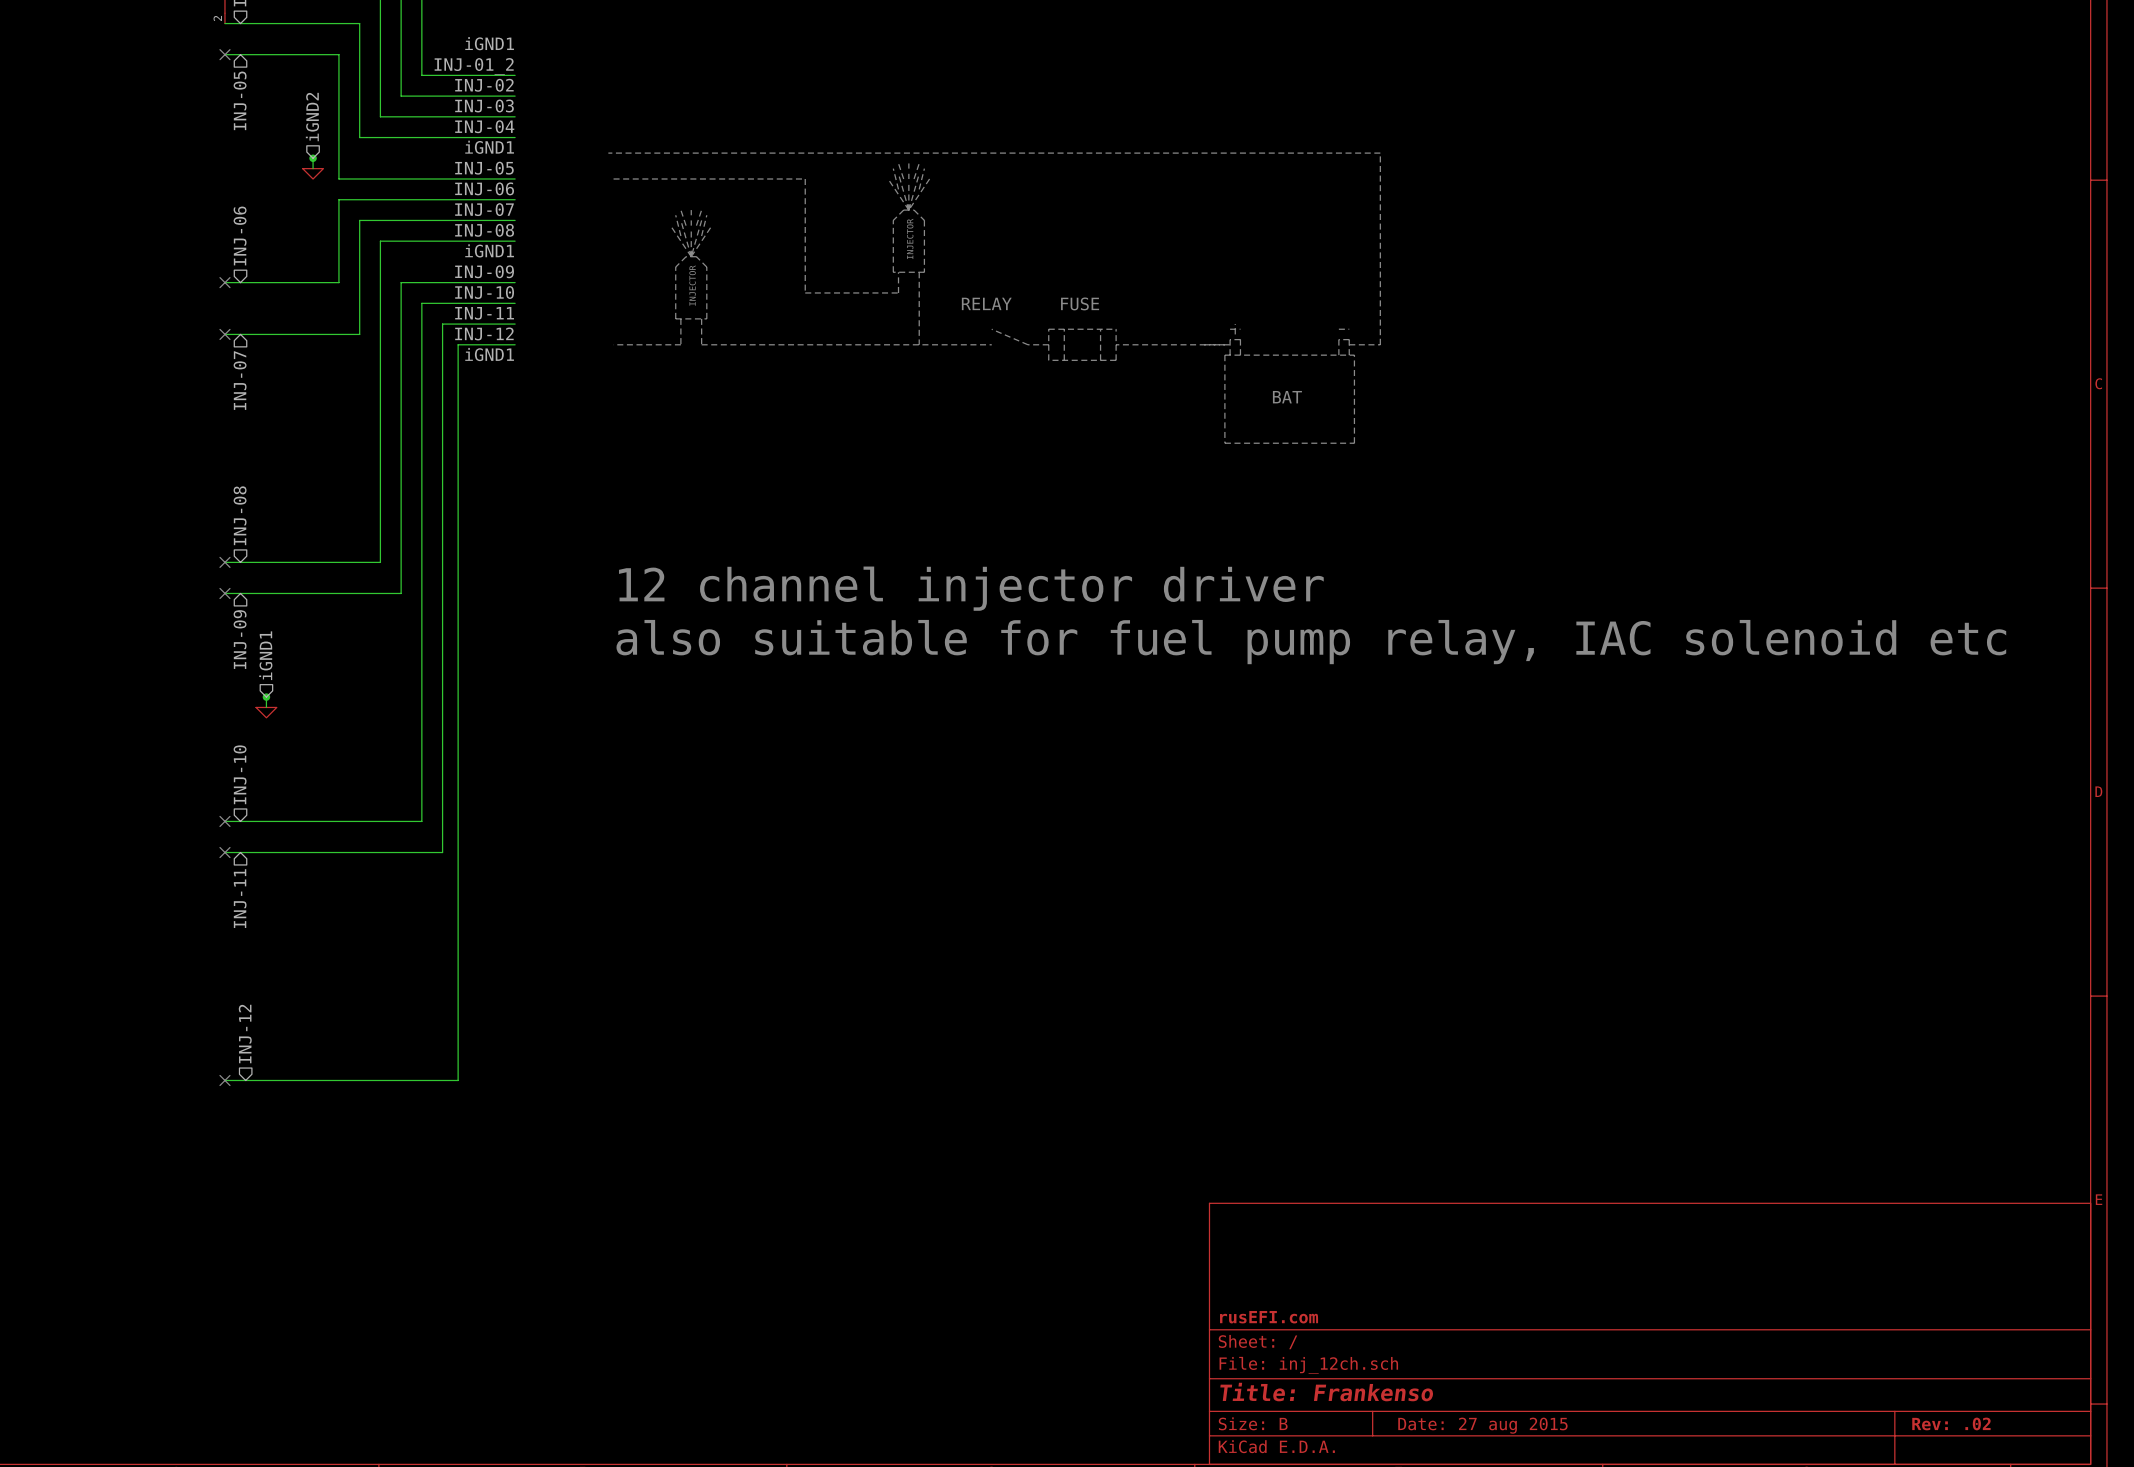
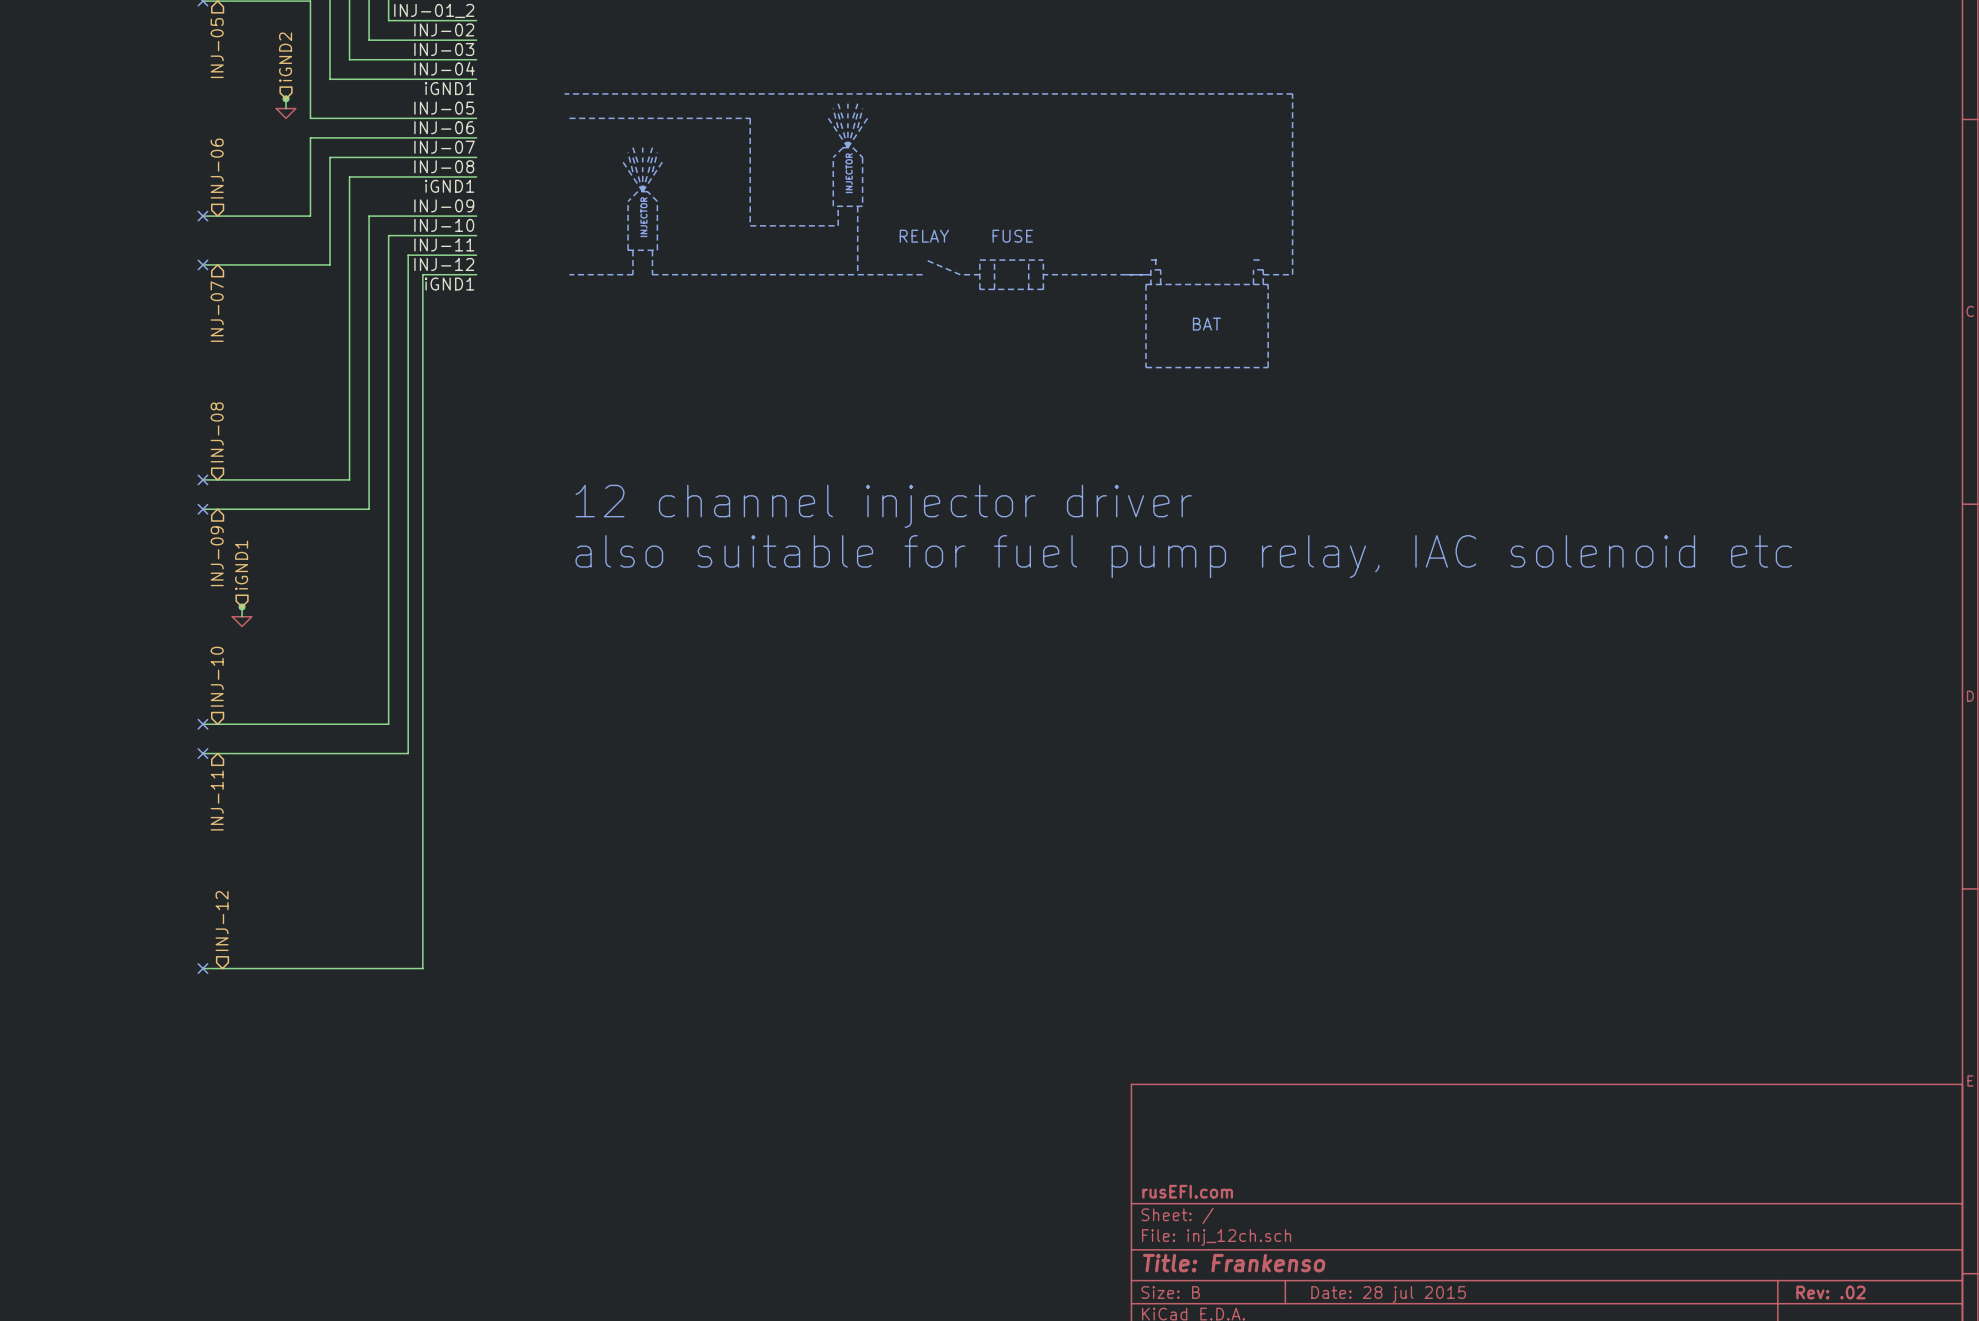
title block: Date: 27 aug 2015 (1482, 1425) -> Date: 28 jul 2015 (1388, 1294)

